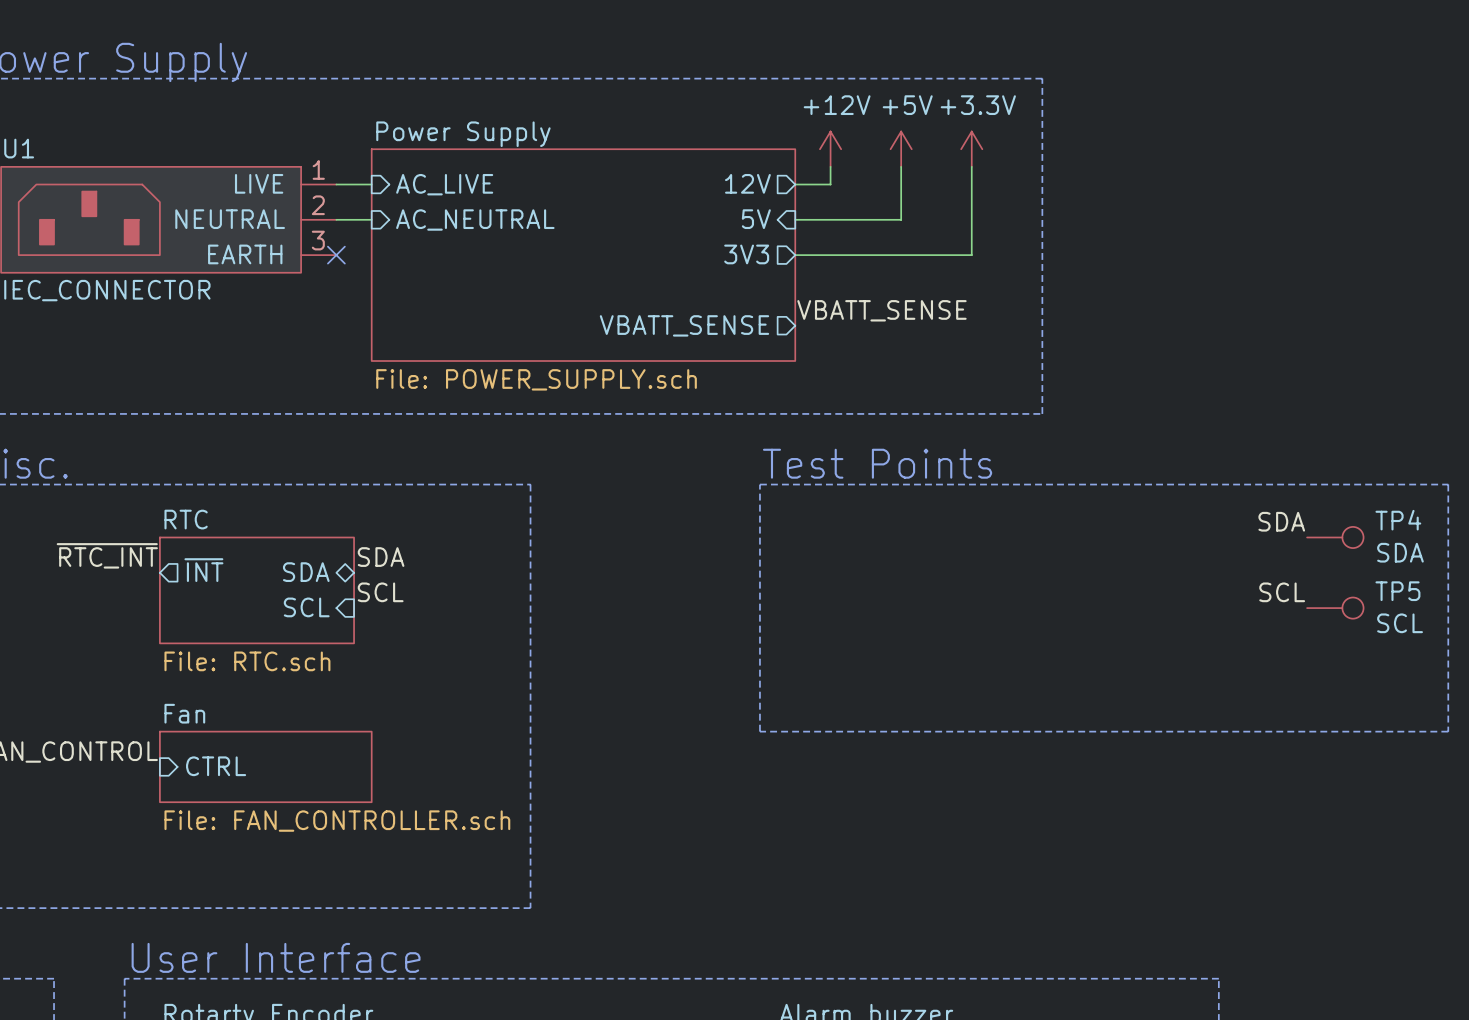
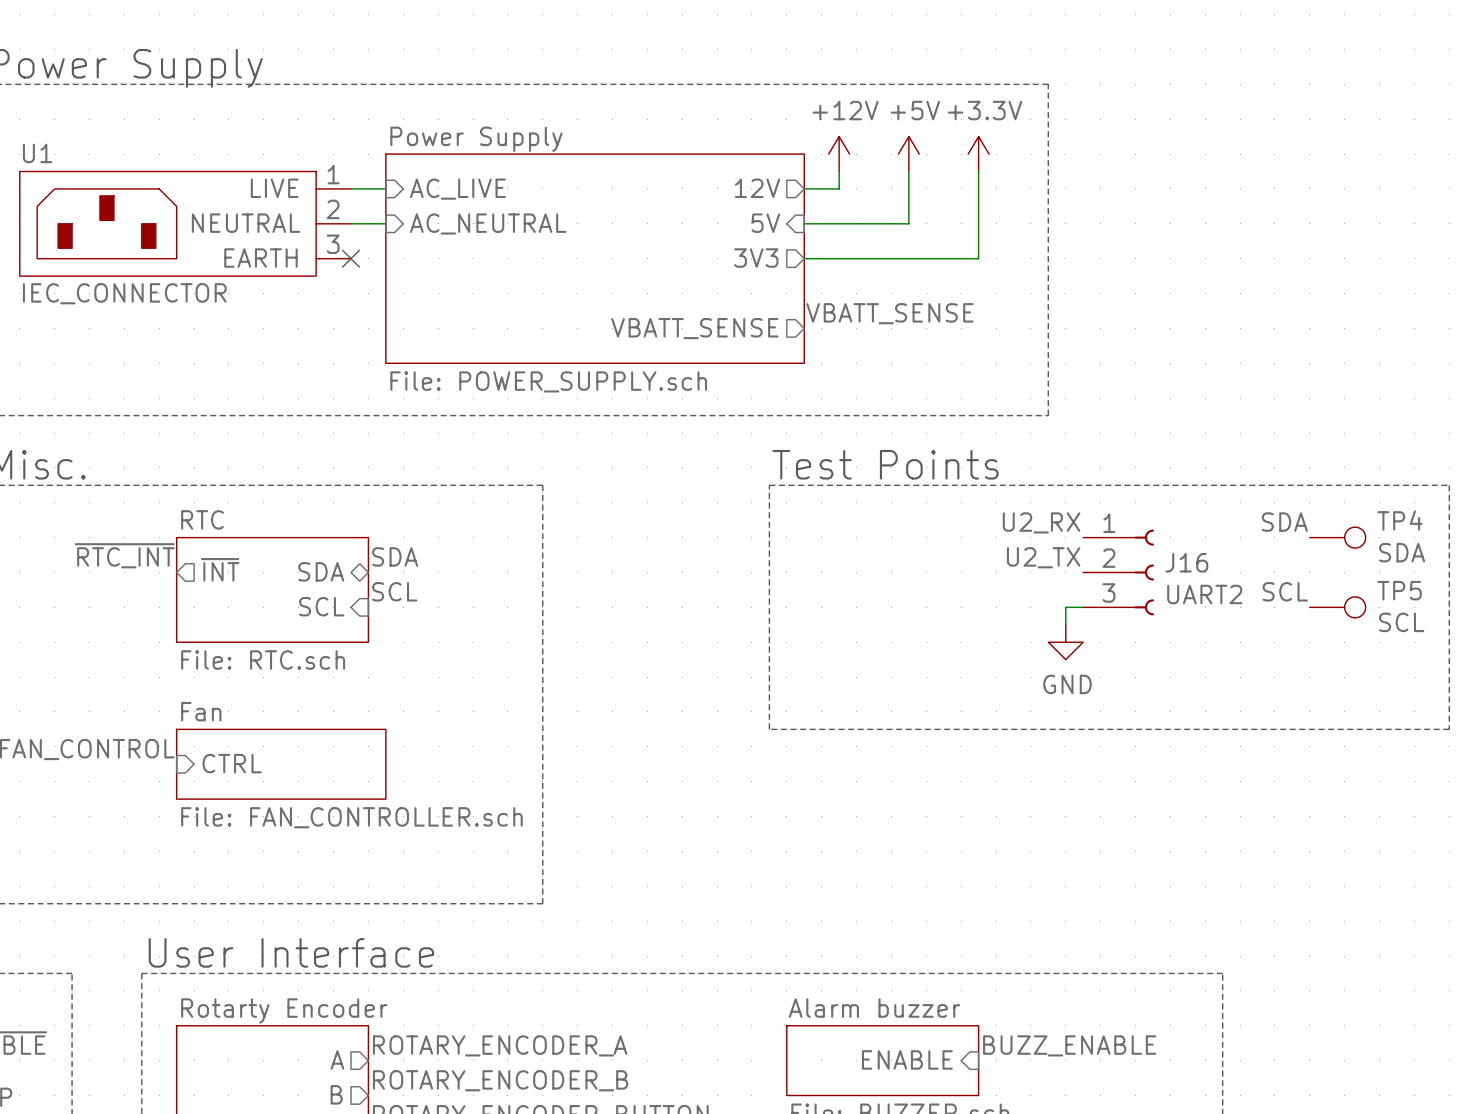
label: none -> U2_RX (1041, 522)
label: none -> U2_TX (1043, 557)
J16: none -> UART2 (1118, 572)
wire: none -> (1083, 607) (1065, 607) (1065, 624)
power symbol: none -> GND (1065, 642)

